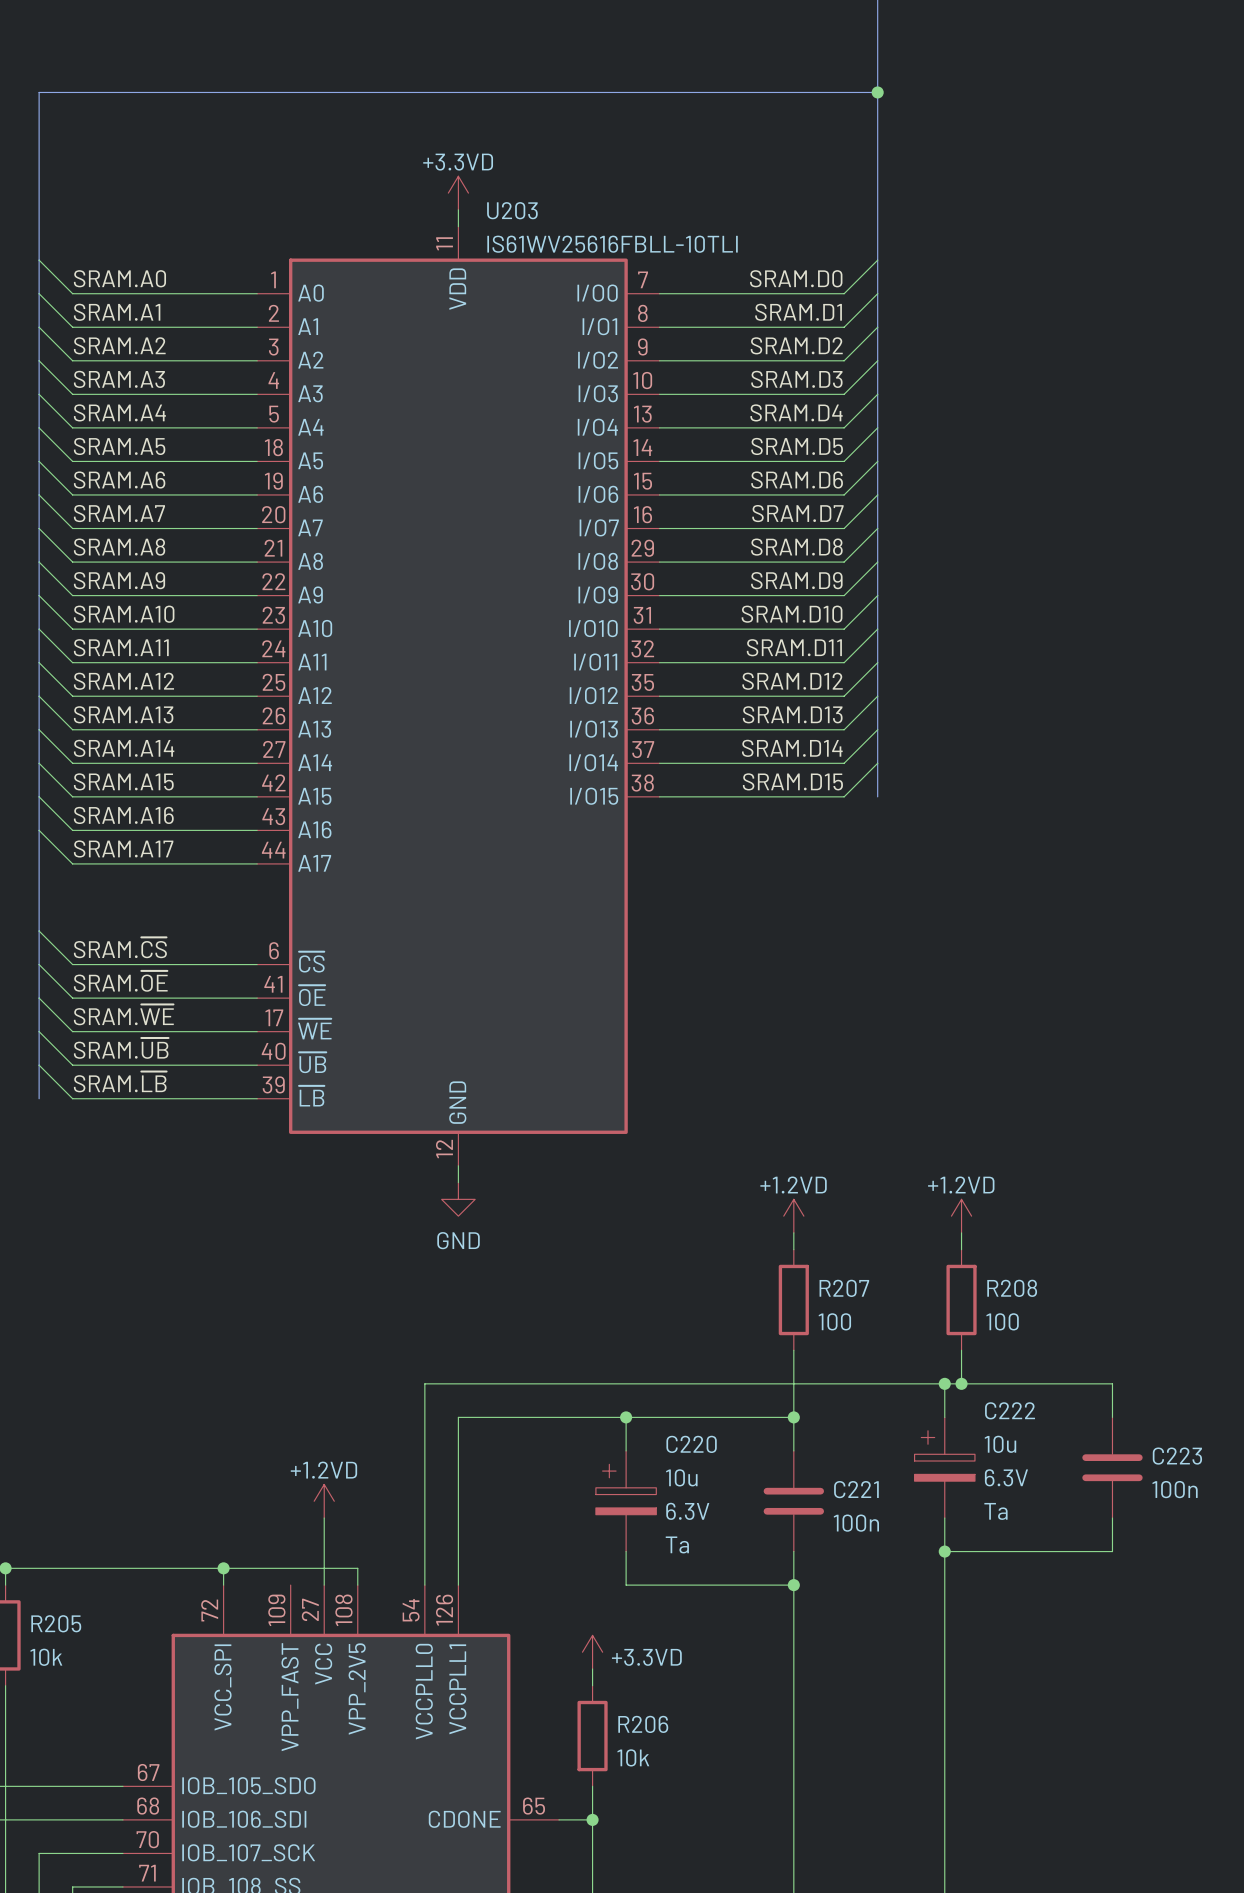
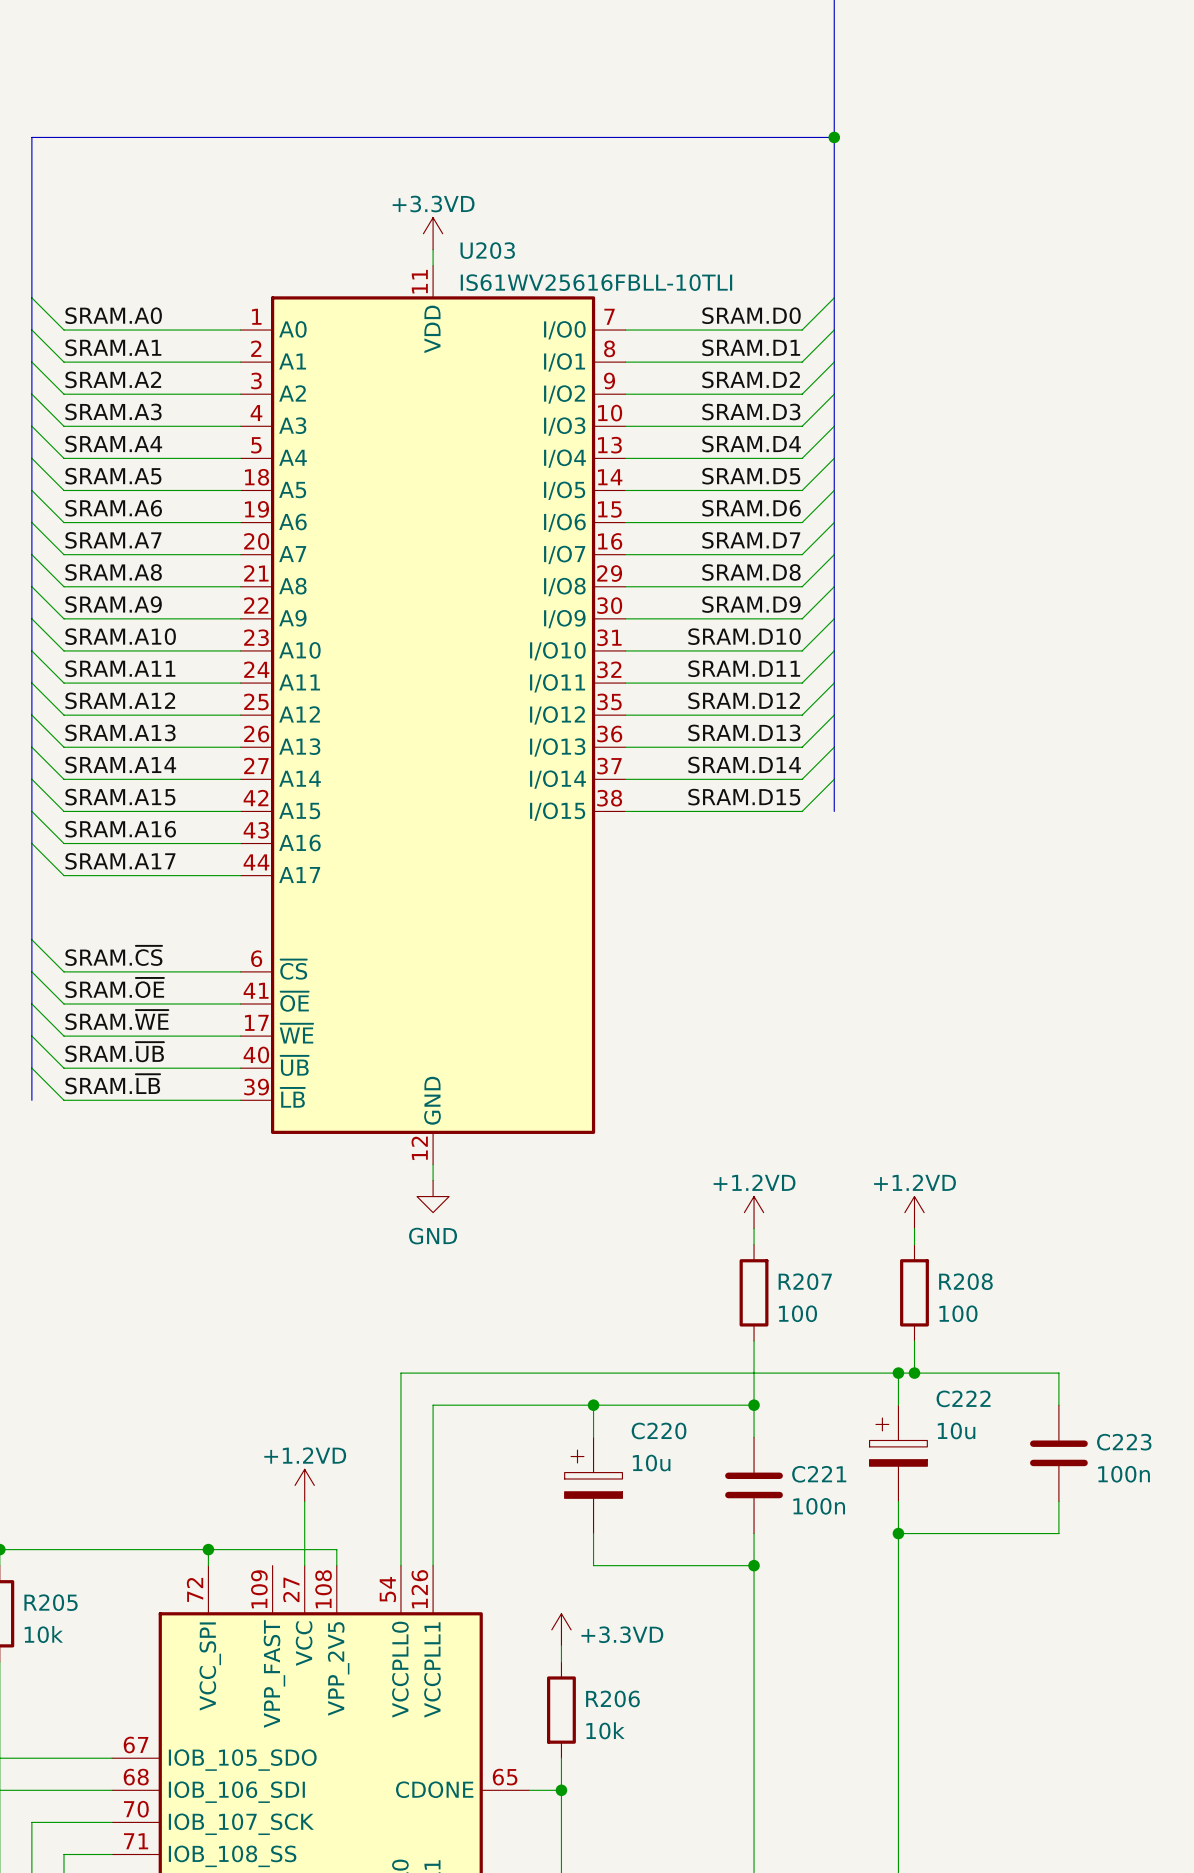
C222 text: 6.3V (1006, 1477) -> none
C220 text: 6.3V (687, 1511) -> none
C222 text: Ta (995, 1511) -> none
C220 text: Ta (677, 1544) -> none

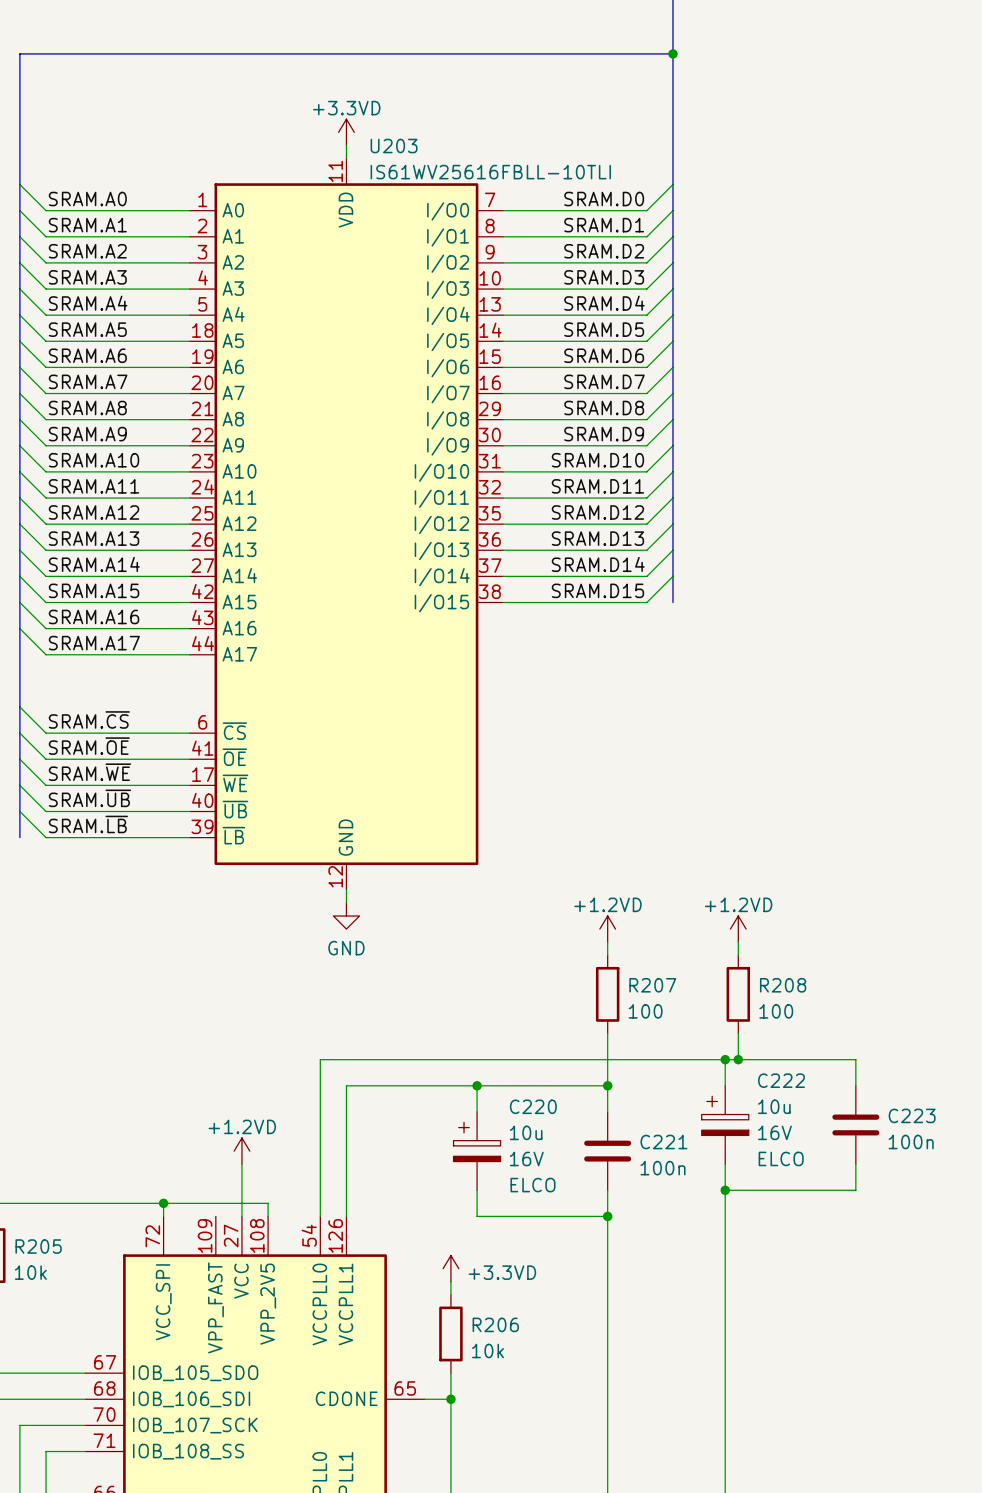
C222 text: none -> 16V (774, 1132)
C220 text: none -> 16V (526, 1158)
C222 text: none -> ELCO (781, 1158)
C220 text: none -> ELCO (533, 1185)

